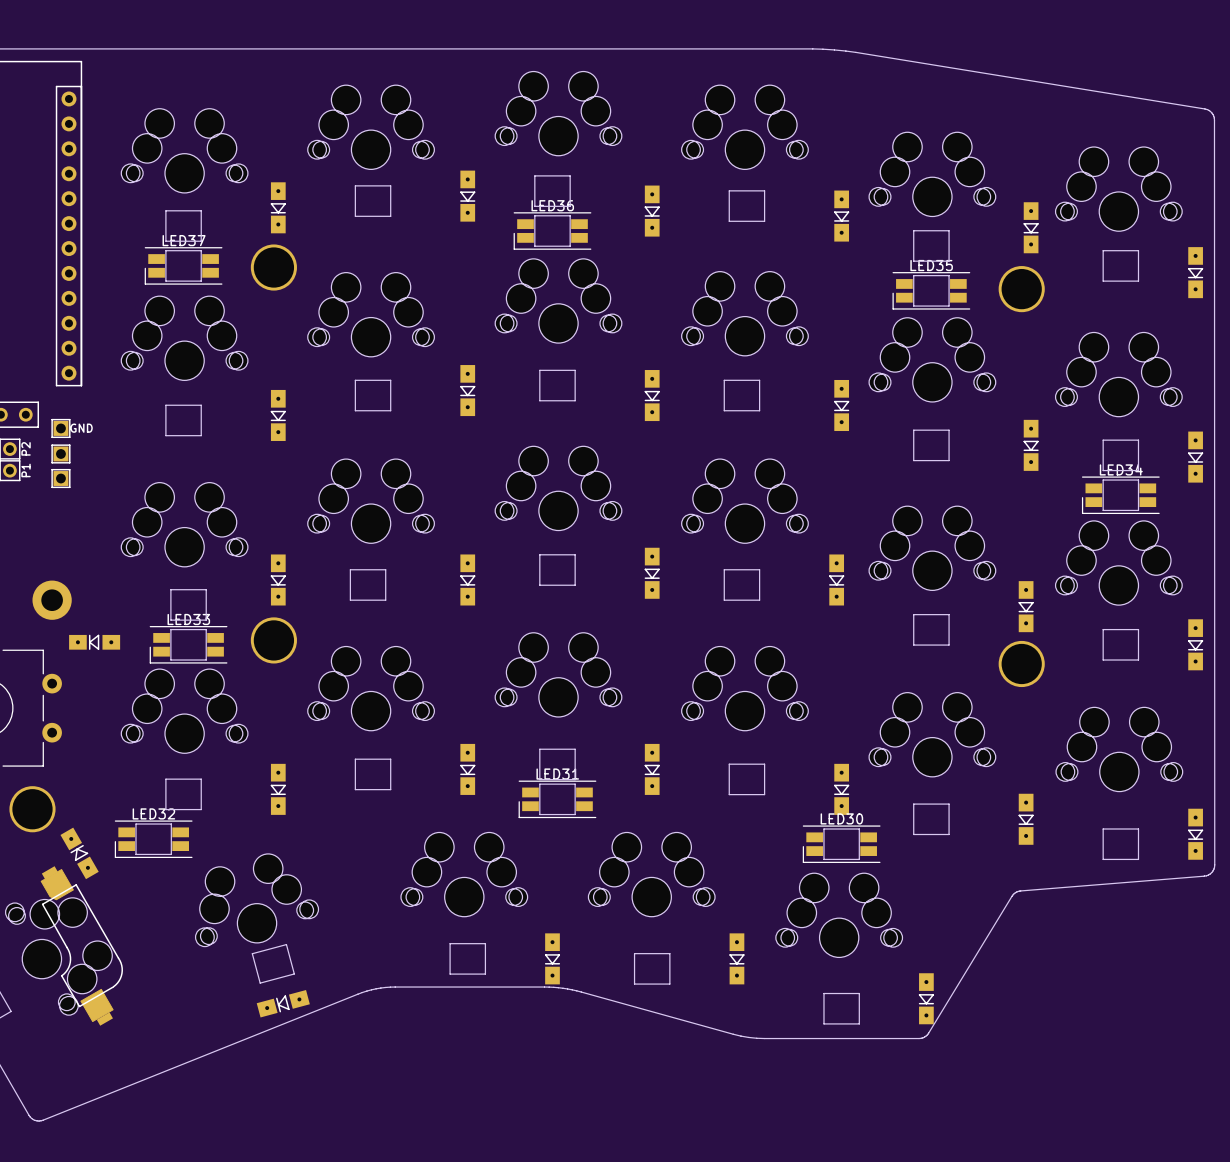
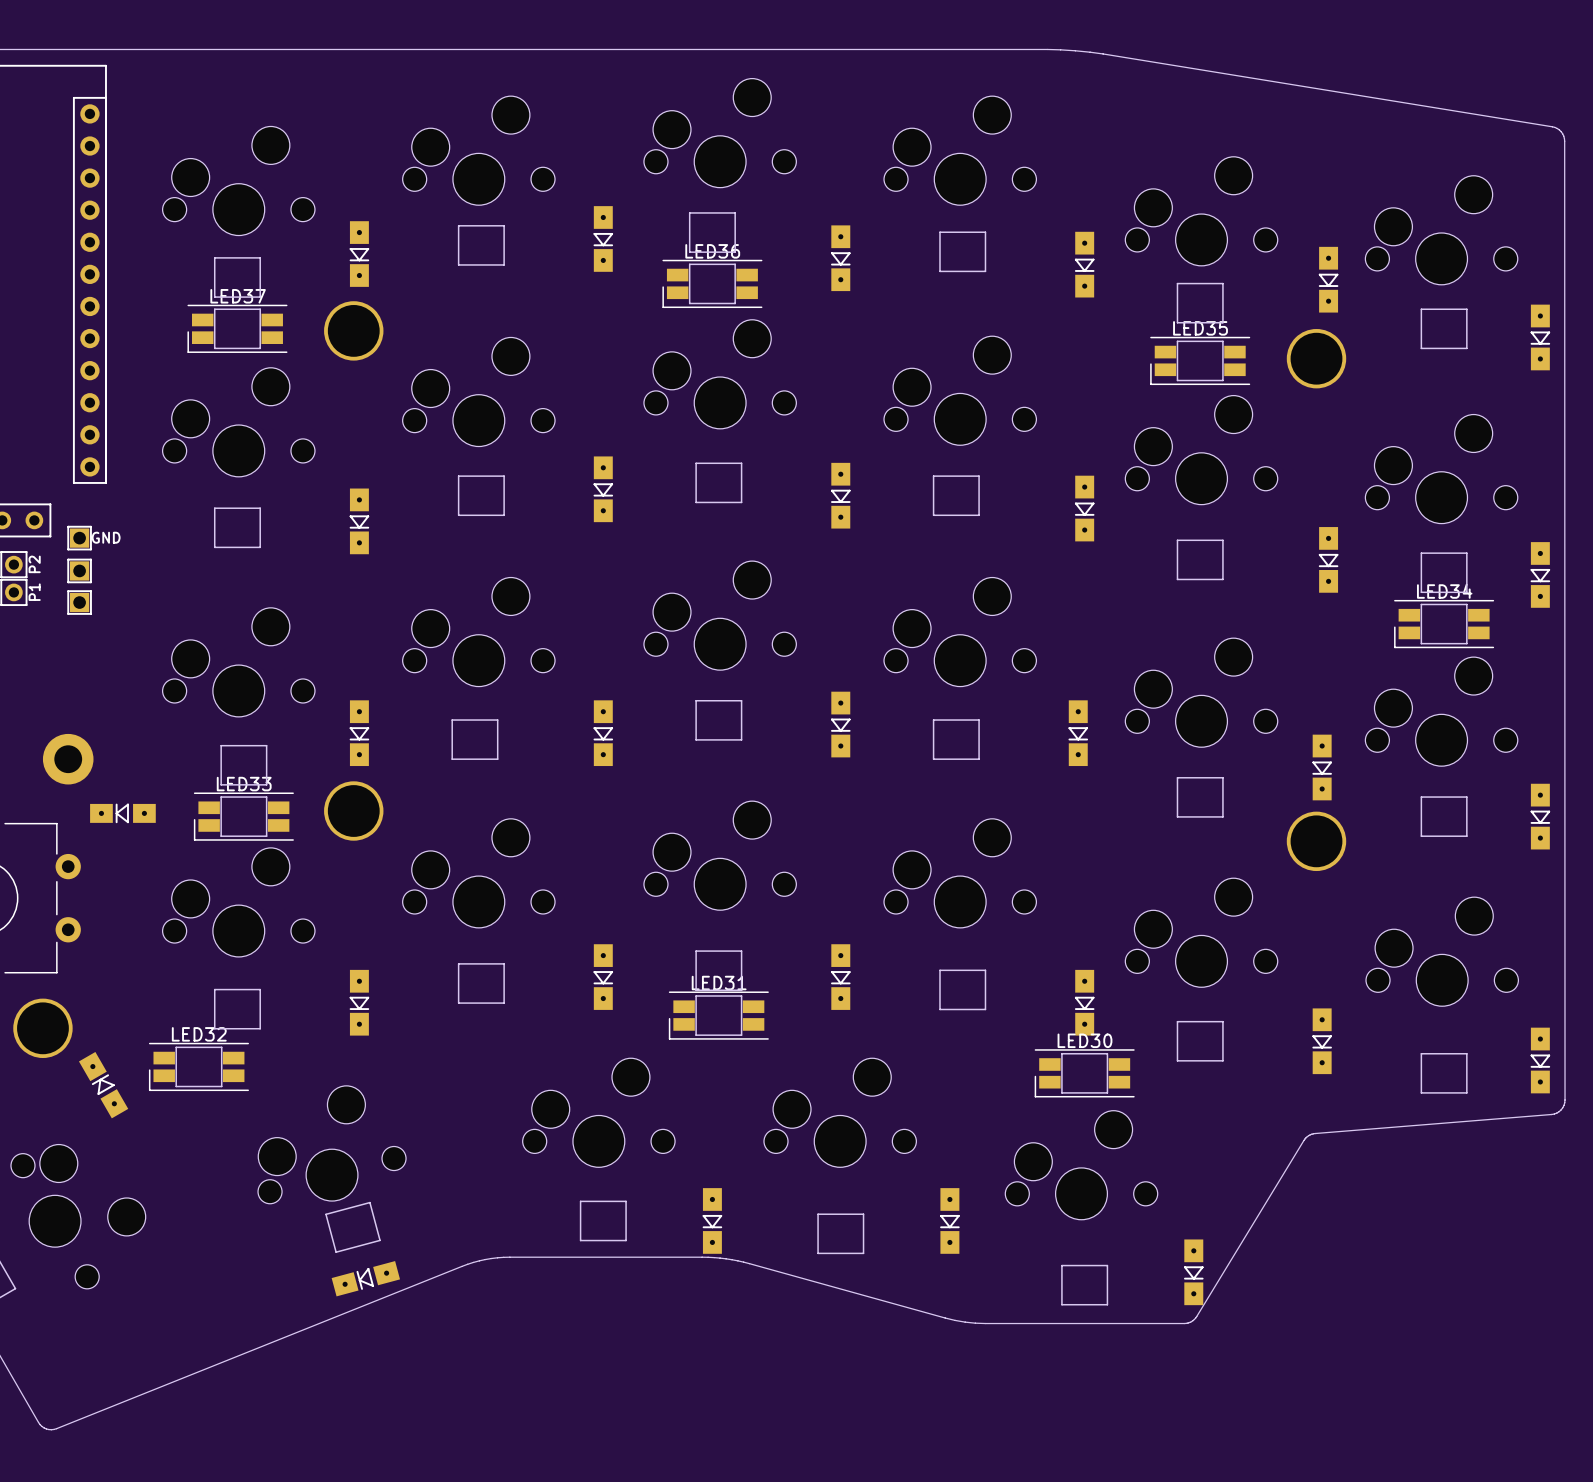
part footprint: [495, 71, 622, 156] -> [643, 78, 797, 188]
part footprint: [307, 85, 435, 170] -> [402, 96, 556, 206]
part footprint: [681, 85, 809, 170] -> [884, 96, 1037, 206]
part footprint: [121, 108, 248, 193] -> [162, 126, 315, 236]
part footprint: [869, 132, 996, 217] -> [1125, 156, 1278, 266]
part footprint: [1055, 147, 1183, 232] -> [1365, 175, 1518, 285]
part footprint: [495, 258, 622, 344] -> [643, 319, 797, 429]
part footprint: [681, 271, 809, 356] -> [884, 336, 1037, 446]
part footprint: [307, 272, 435, 357] -> [402, 337, 556, 447]
part footprint: [121, 296, 248, 381] -> [162, 367, 315, 477]
part footprint: [869, 317, 996, 402] -> [1125, 395, 1278, 505]
part footprint: [1055, 332, 1183, 417] -> [1365, 414, 1518, 524]
part footprint: [495, 446, 622, 531] -> [643, 561, 797, 671]
part footprint: [307, 459, 435, 544] -> [402, 577, 556, 687]
part footprint: [681, 459, 809, 544] -> [884, 577, 1037, 687]
part footprint: [121, 482, 248, 567] -> [162, 607, 315, 717]
part footprint: [869, 506, 996, 591] -> [1125, 638, 1278, 748]
part footprint: [1055, 520, 1183, 606] -> [1365, 657, 1518, 767]
part footprint: [495, 632, 622, 717] -> [643, 801, 797, 911]
part footprint: [307, 646, 435, 731] -> [402, 818, 556, 928]
part footprint: [681, 646, 809, 731] -> [884, 818, 1037, 928]
part footprint: [121, 669, 248, 754] -> [162, 847, 315, 957]
part footprint: [869, 692, 996, 777] -> [1125, 878, 1278, 988]
part footprint: [1056, 707, 1183, 792] -> [1366, 897, 1519, 1007]
part footprint: [400, 832, 528, 917] -> [522, 1058, 676, 1168]
part footprint: [588, 832, 716, 917] -> [764, 1058, 917, 1168]
part footprint: [195, 853, 319, 947] -> [258, 1085, 407, 1204]
part footprint: [775, 873, 903, 958] -> [1005, 1110, 1158, 1220]
part: (64, 945) -> none
part: none -> (78, 1216)

